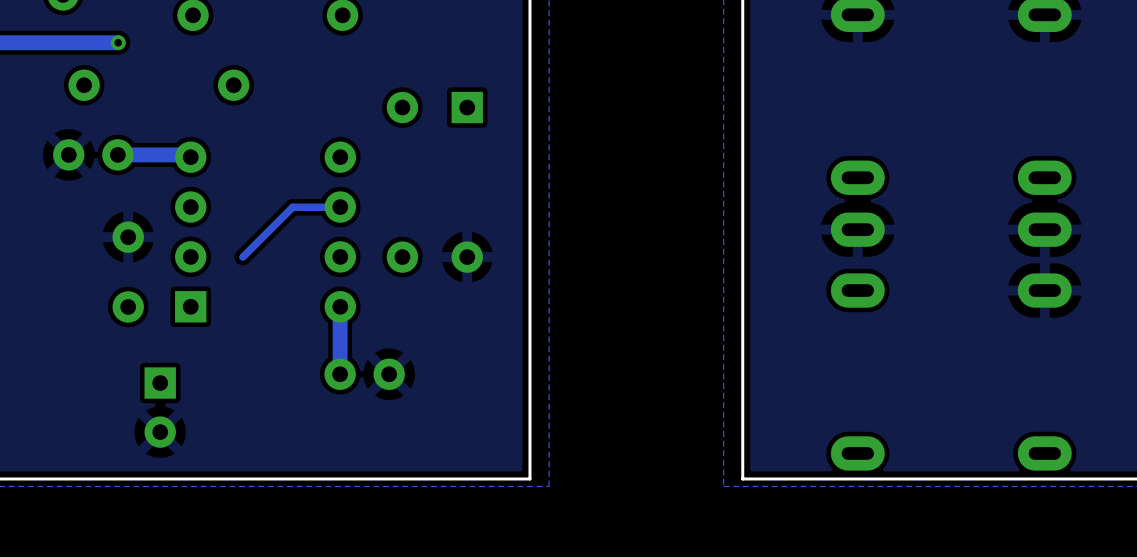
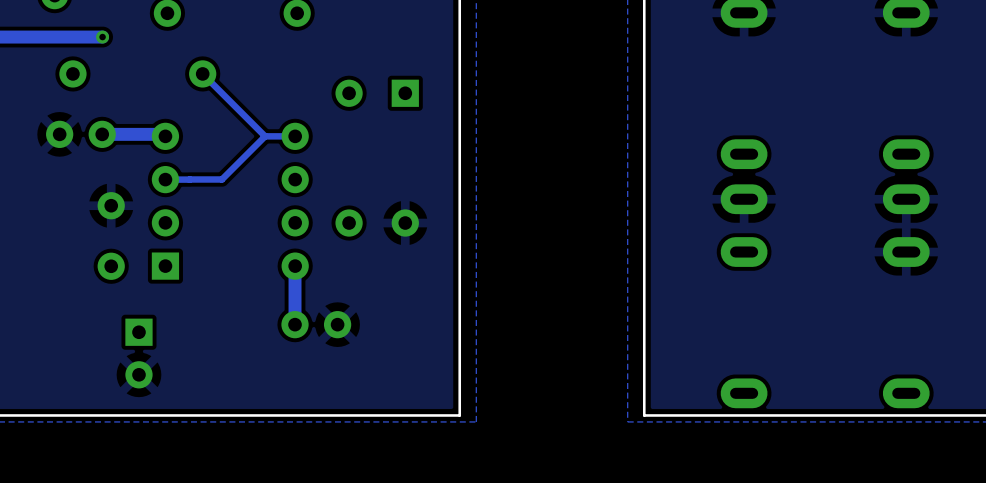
track: none -> (202, 73) (265, 136)
track: none -> (265, 136) (221, 179) (165, 179)
track: none -> (295, 136) (265, 136)
track: (340, 207) (292, 207) (242, 257) -> none

